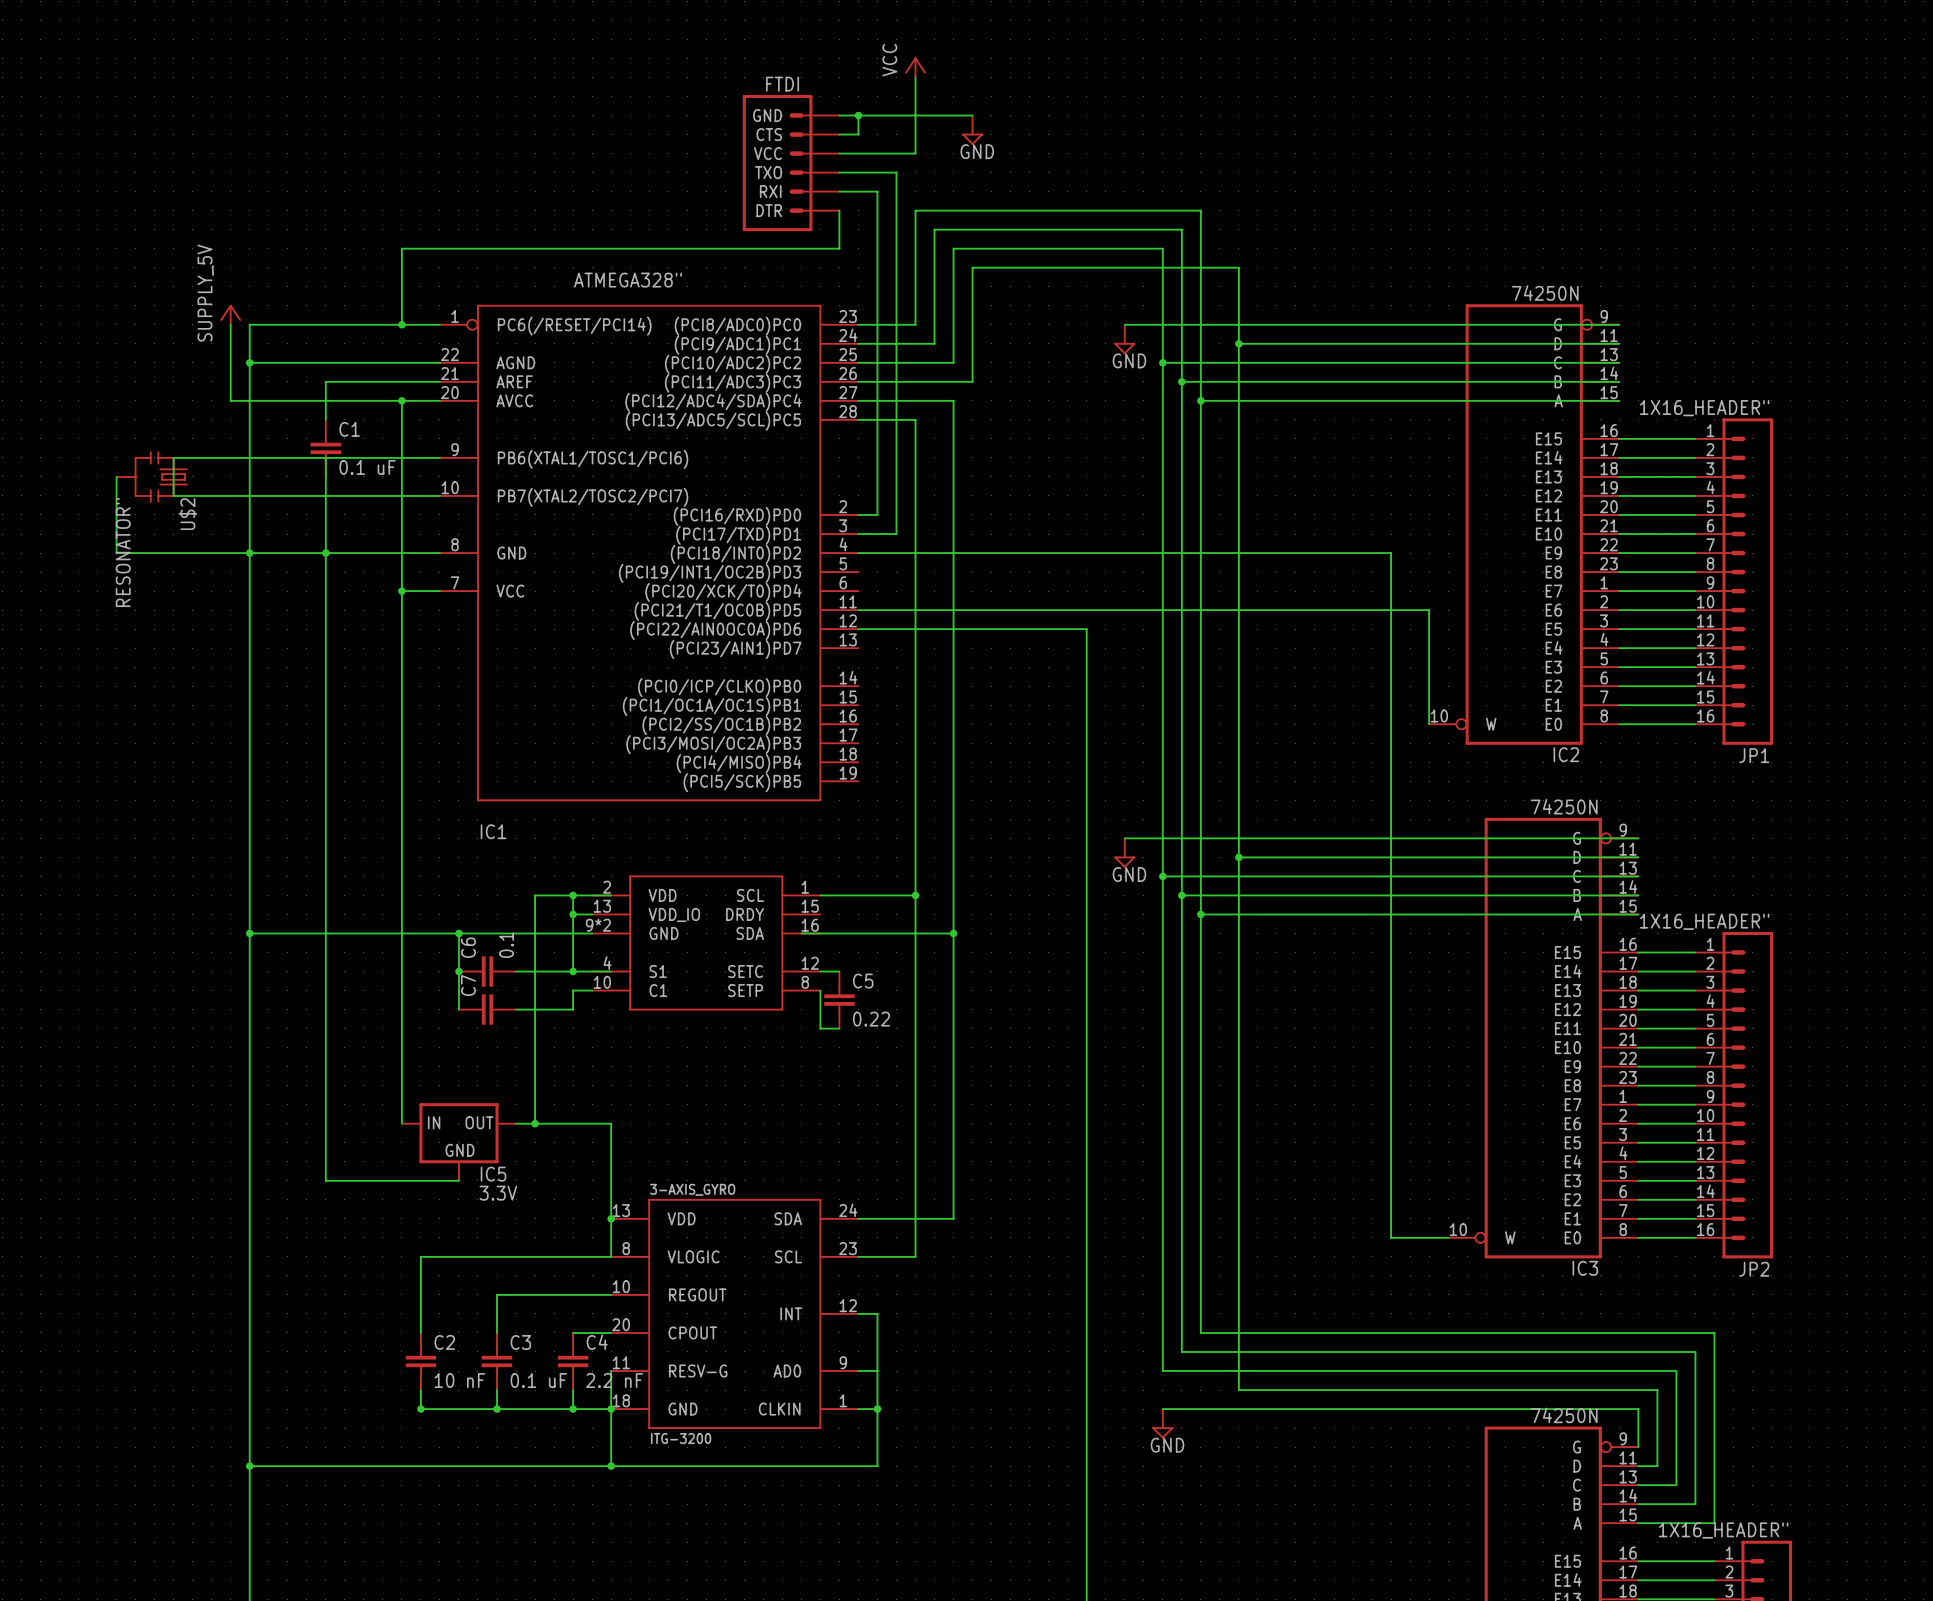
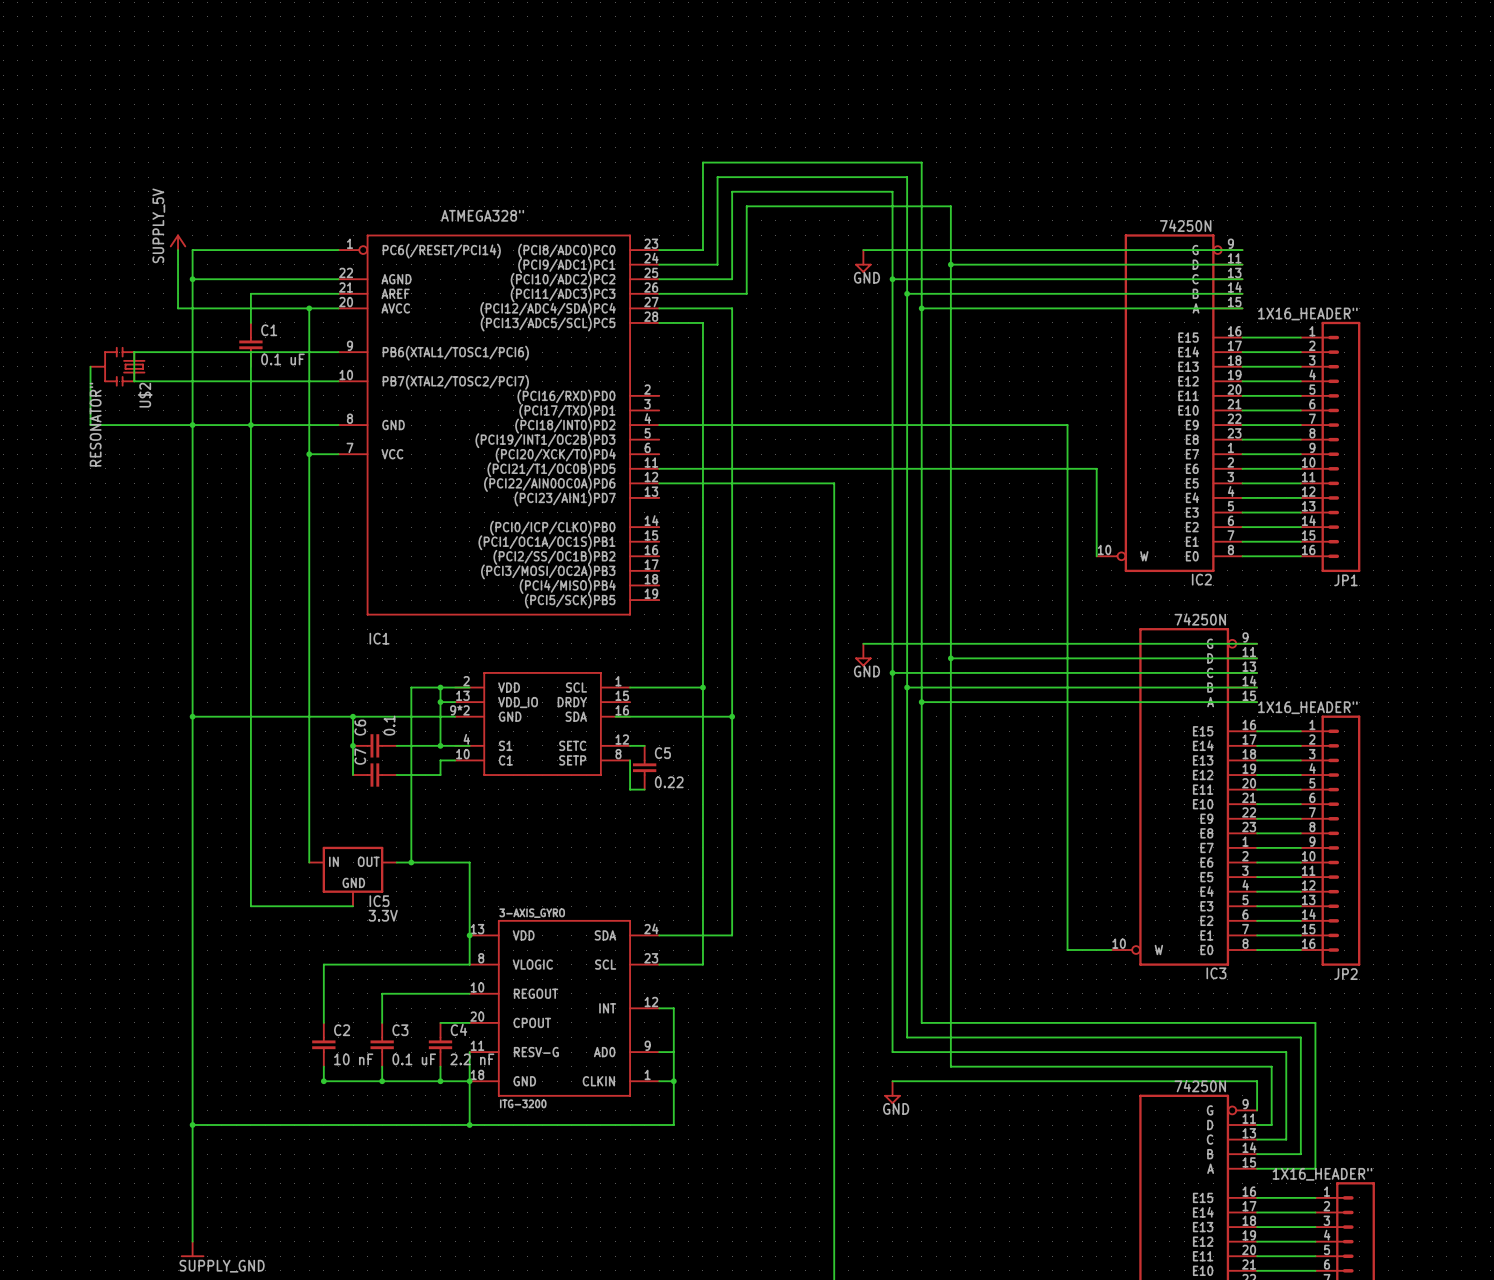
power symbol: VCC (915, 67) -> none
wire: (915, 77) (915, 153) (839, 153) -> none
wire: (839, 115) (972, 115) -> none
wire: (858, 115) (858, 134) (839, 134) -> none
junction: (858, 115) -> none
power symbol: GND (972, 130) -> none
FTDI: (791, 163) -> none
wire: (839, 172) (896, 172) (896, 534) (858, 534) -> none
wire: (839, 191) (877, 191) (877, 514) (858, 514) -> none
wire: (839, 210) (839, 248) (401, 248) (401, 324) -> none
junction: (401, 324) -> none

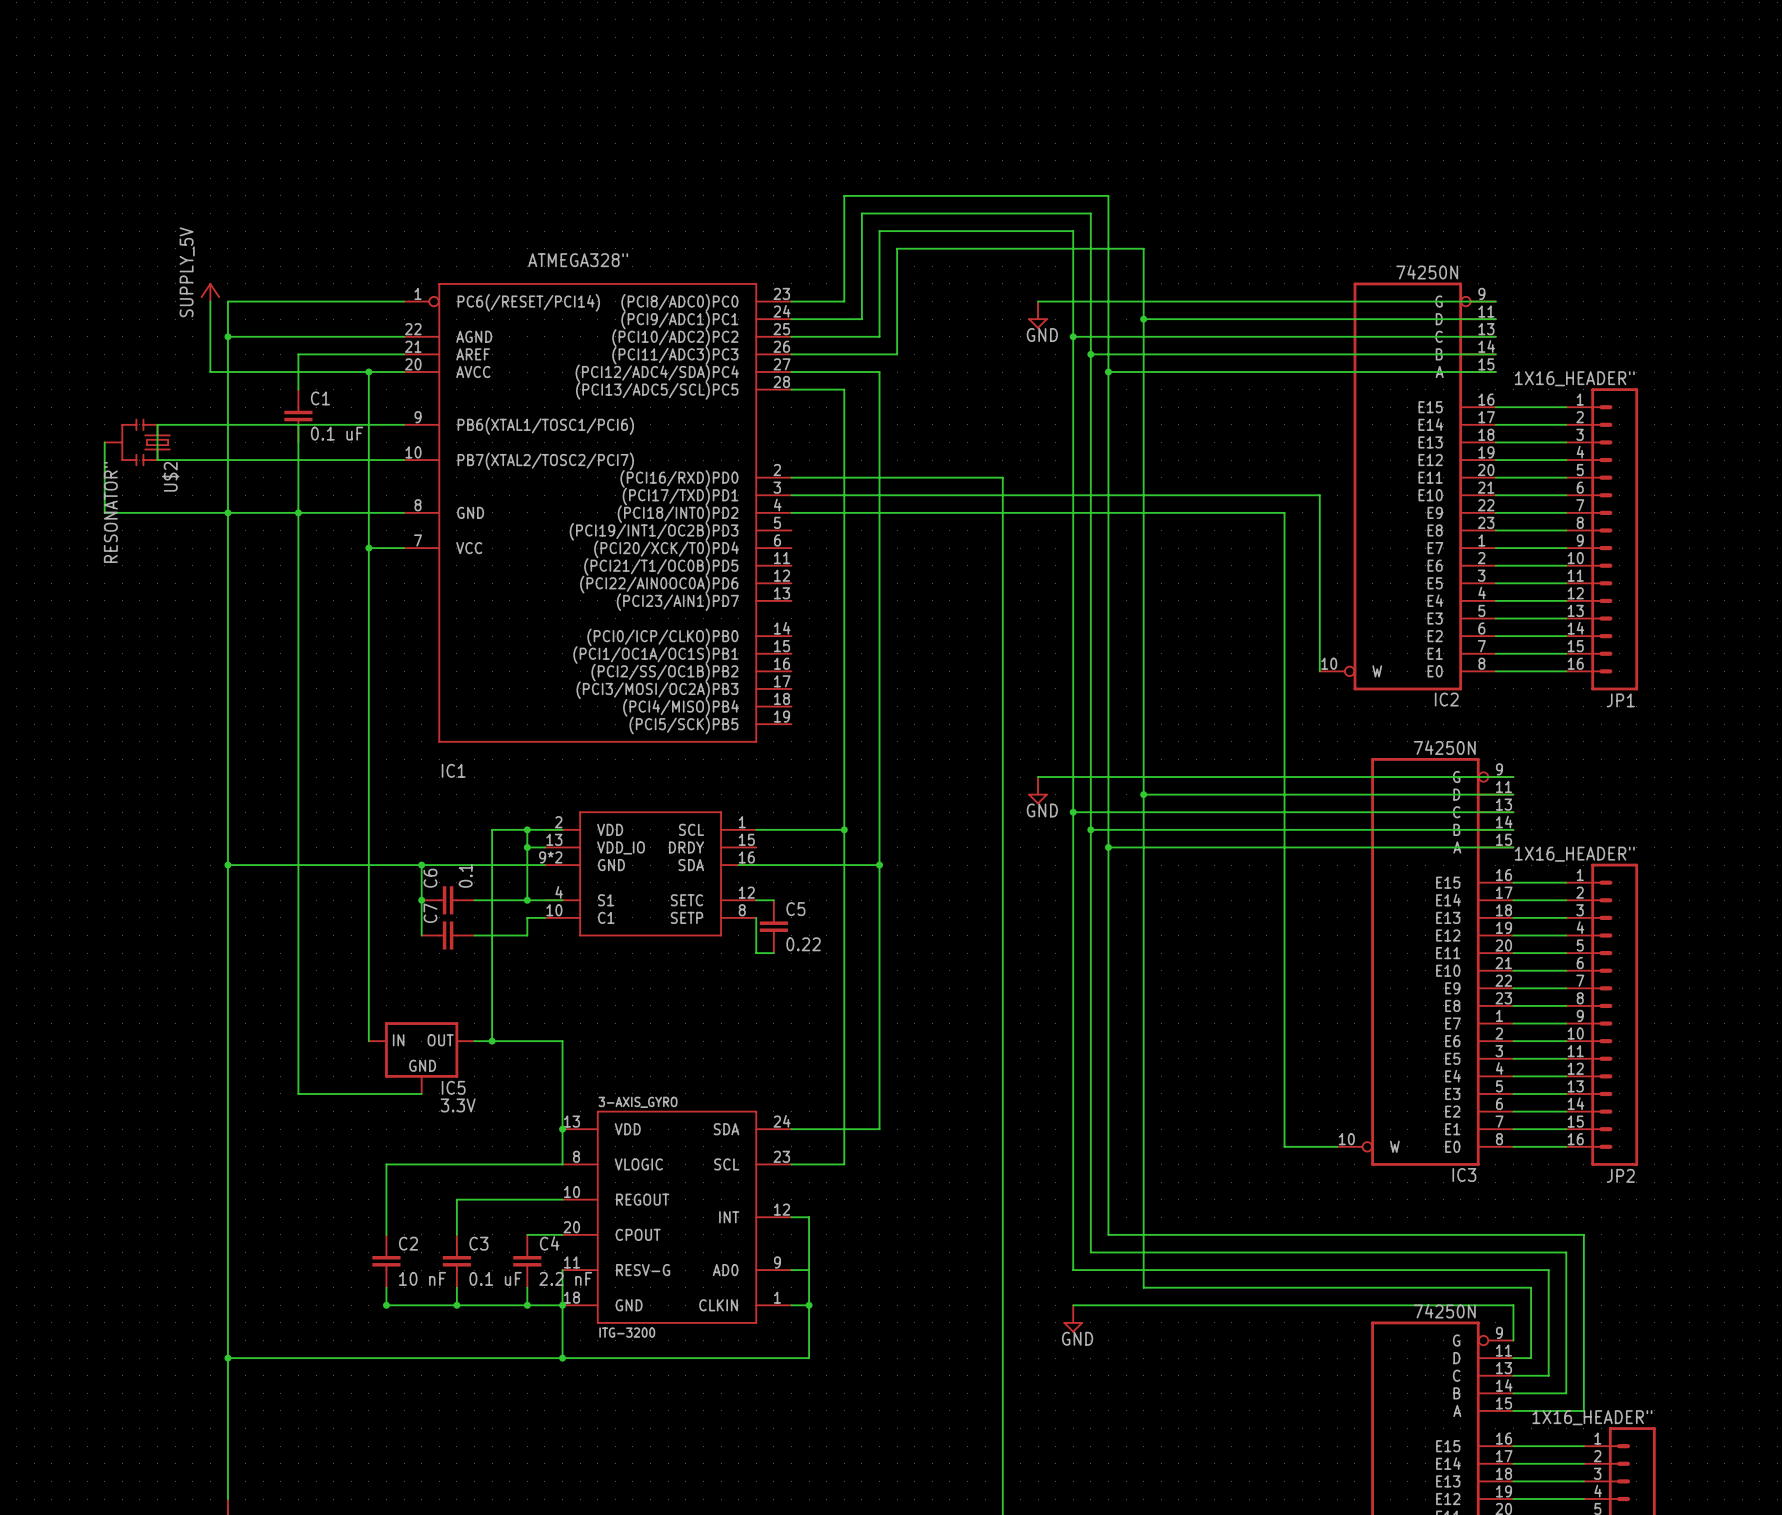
wire: (659, 468) (1096, 468) -> (791, 495) (1319, 495) (1319, 565)
wire: (659, 483) (834, 483) -> (791, 477) (1002, 477) (1002, 583)

